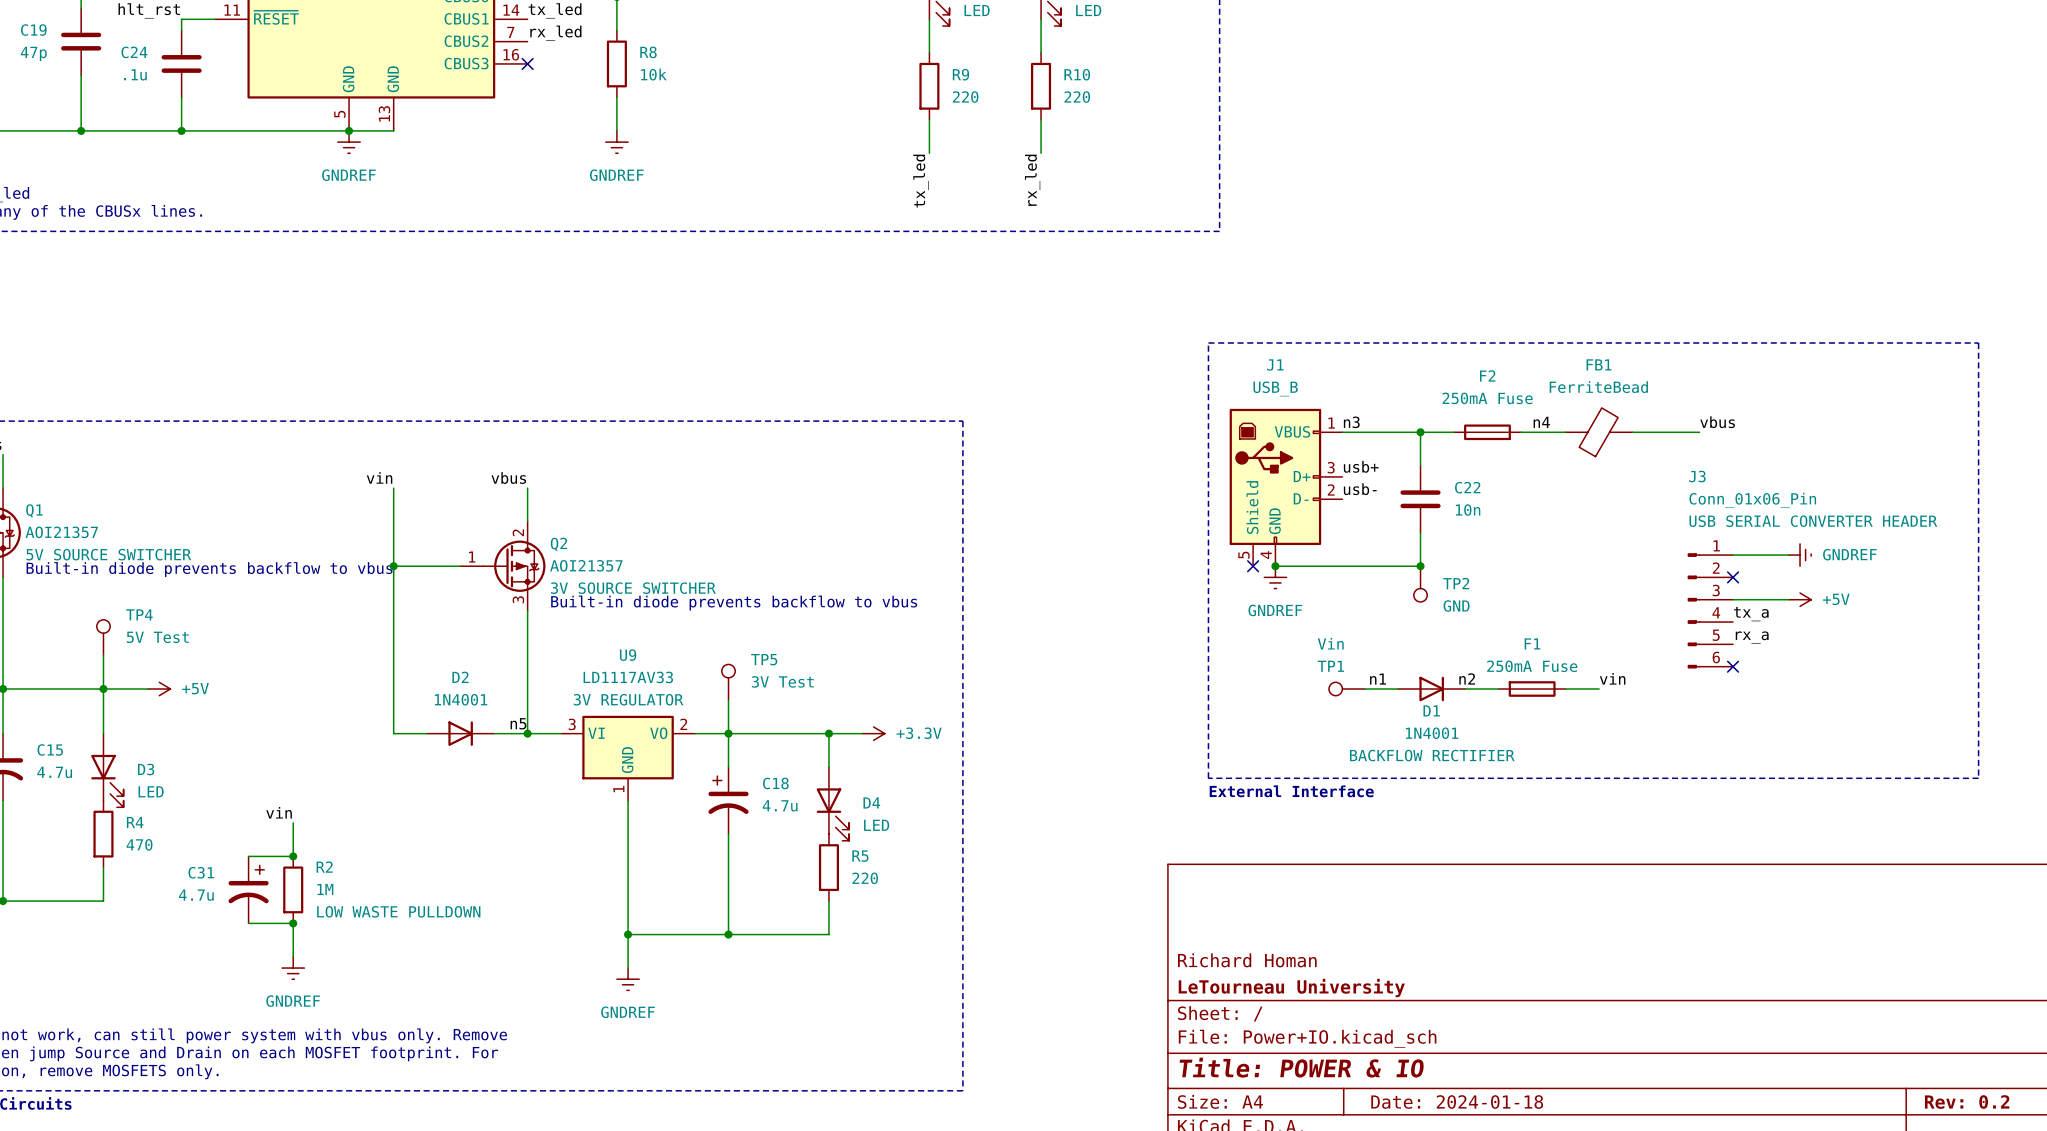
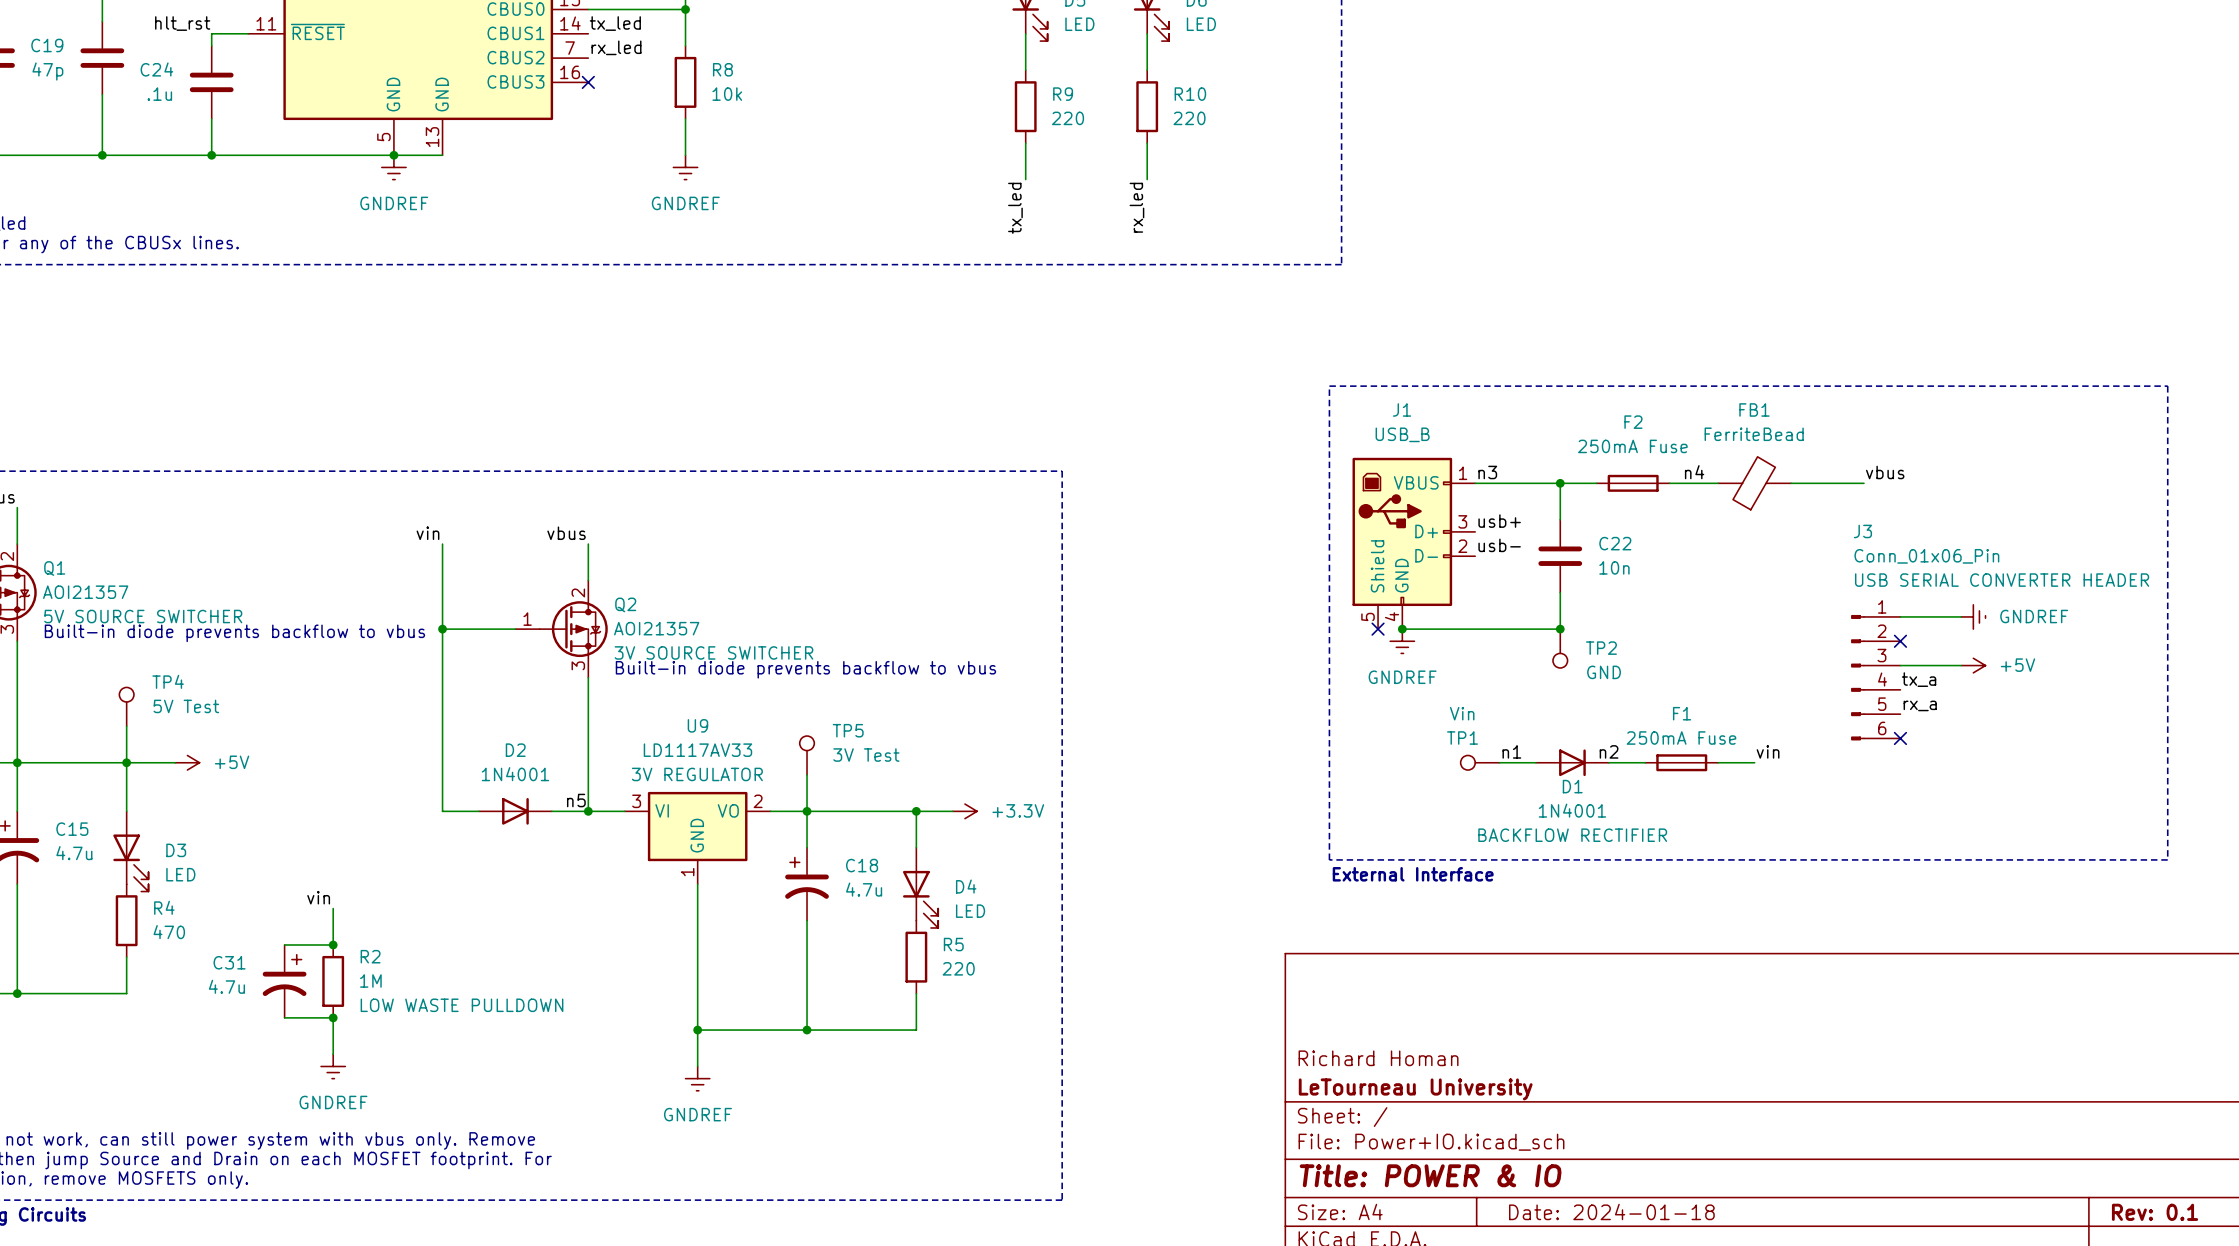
title block: Rev: 0.2 (1967, 1102) -> Rev: 0.1 (2155, 1212)

